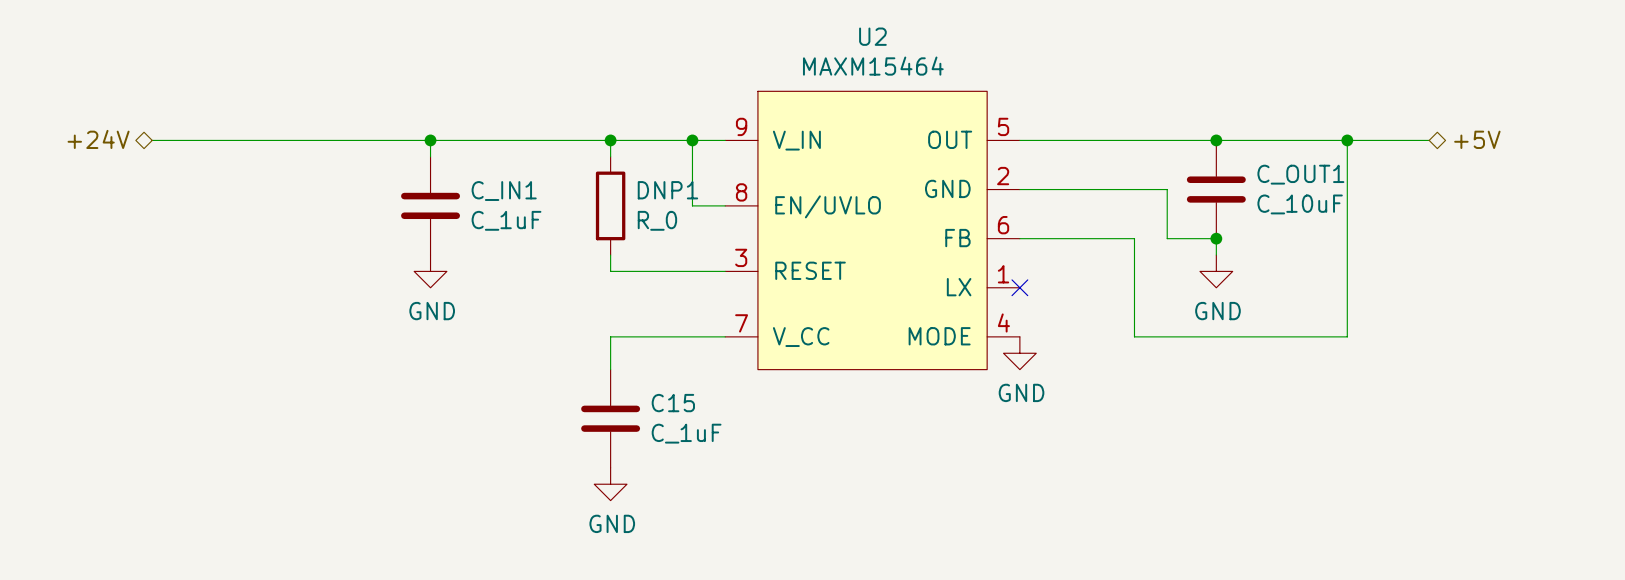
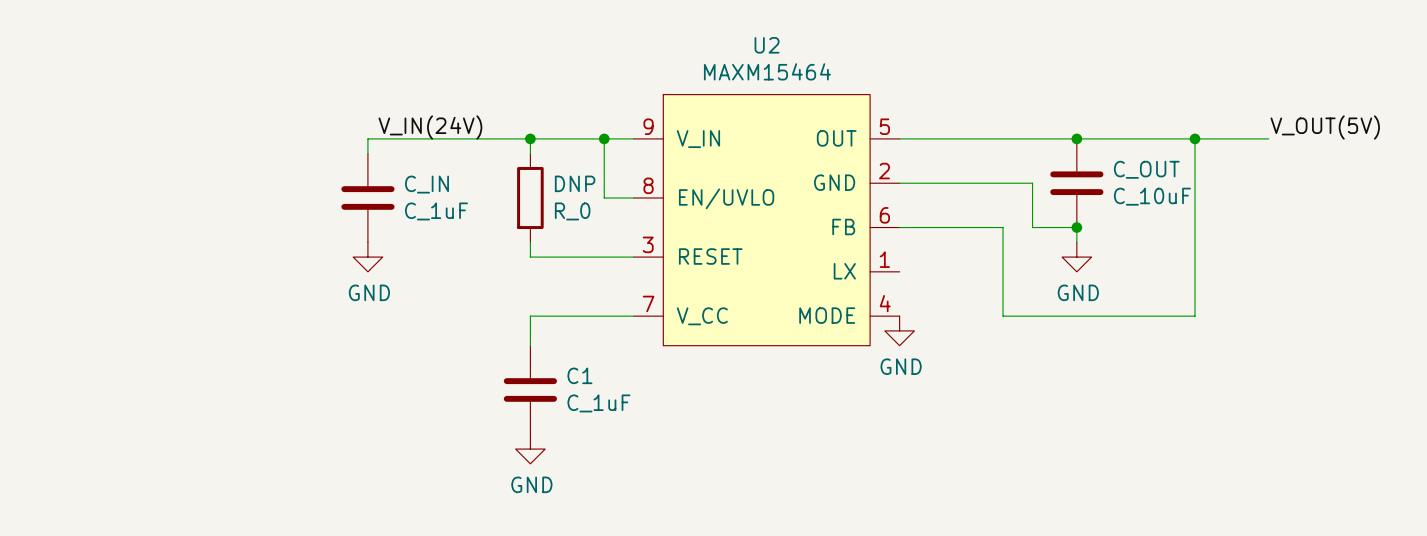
label: none -> V_IN(24V) (430, 127)
label: none -> V_OUT(5V) (1325, 127)
hierarchical label: +24V (98, 139) -> none
hierarchical label: +5V (1477, 139) -> none
wire: (152, 140) (430, 140) -> none
junction: (430, 140) -> none
C_OUT1 name: C_OUT1 (1300, 174) -> C_OUT (1146, 169)
DNP1 name: DNP1 (667, 190) -> DNP (575, 183)
C_IN1 name: C_IN1 (504, 191) -> C_IN (426, 184)
no-connect mark: (1019, 287) -> none
C15 name: C15 (673, 403) -> C1 (579, 375)

